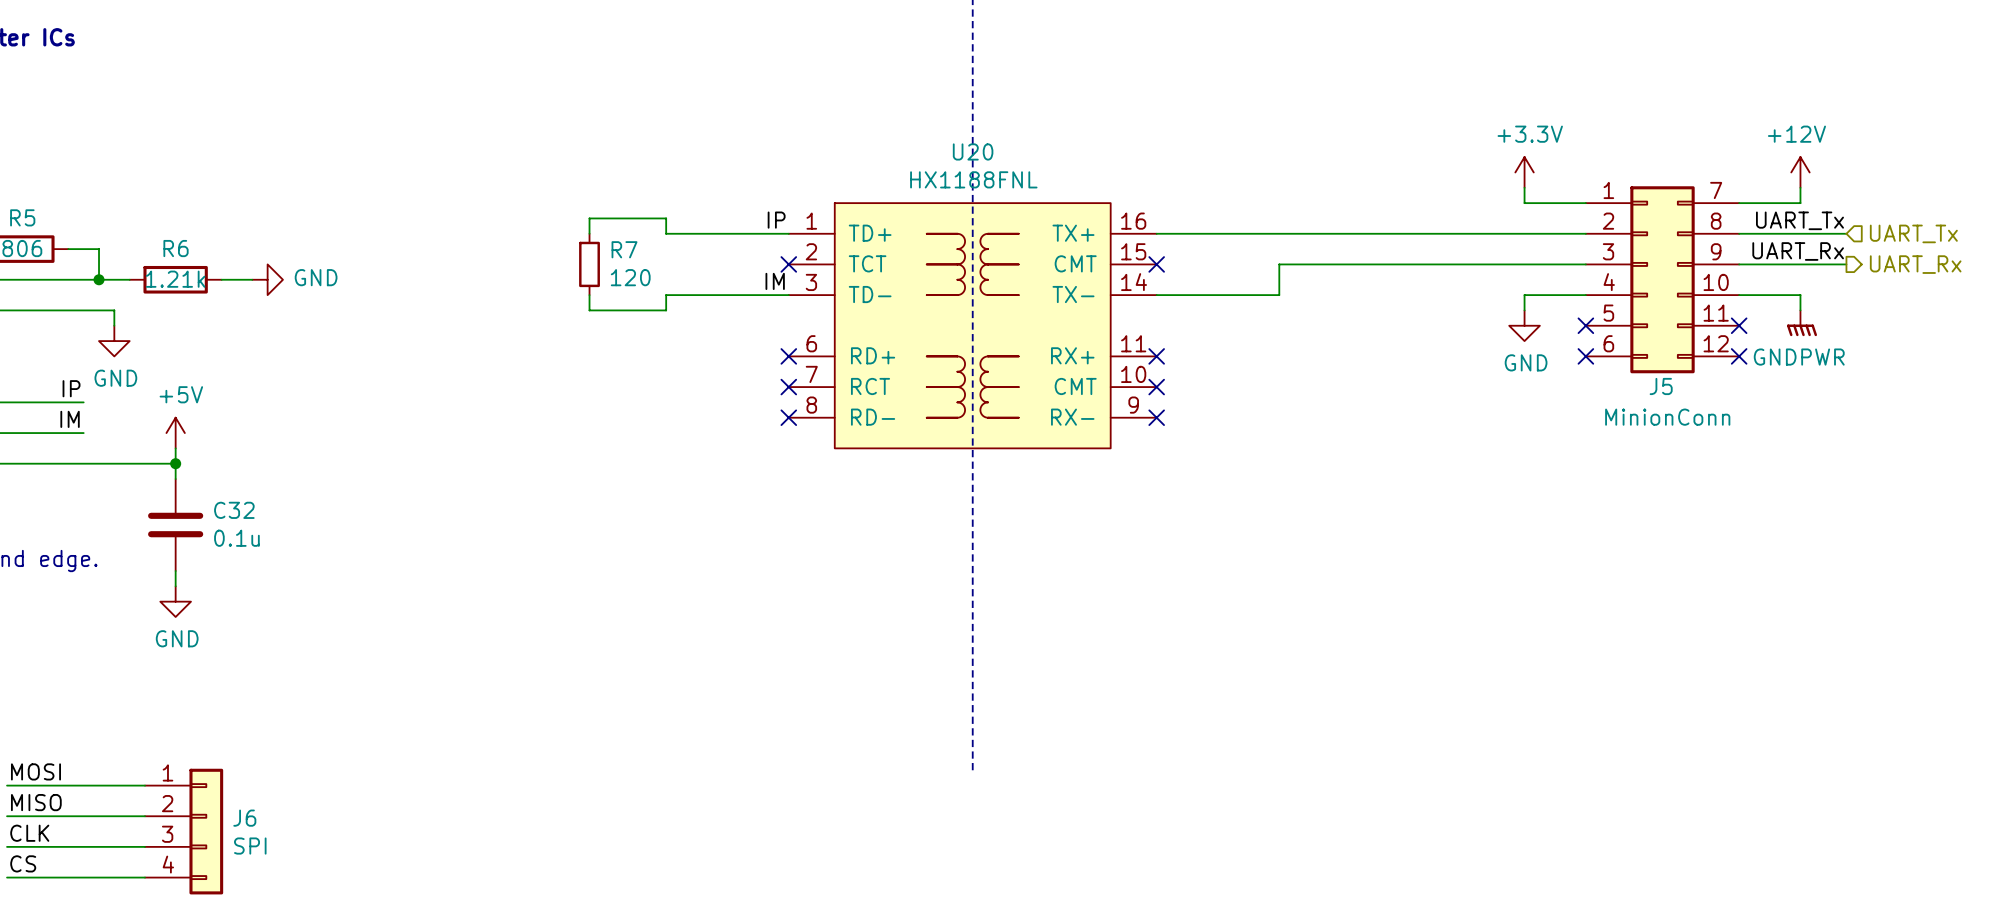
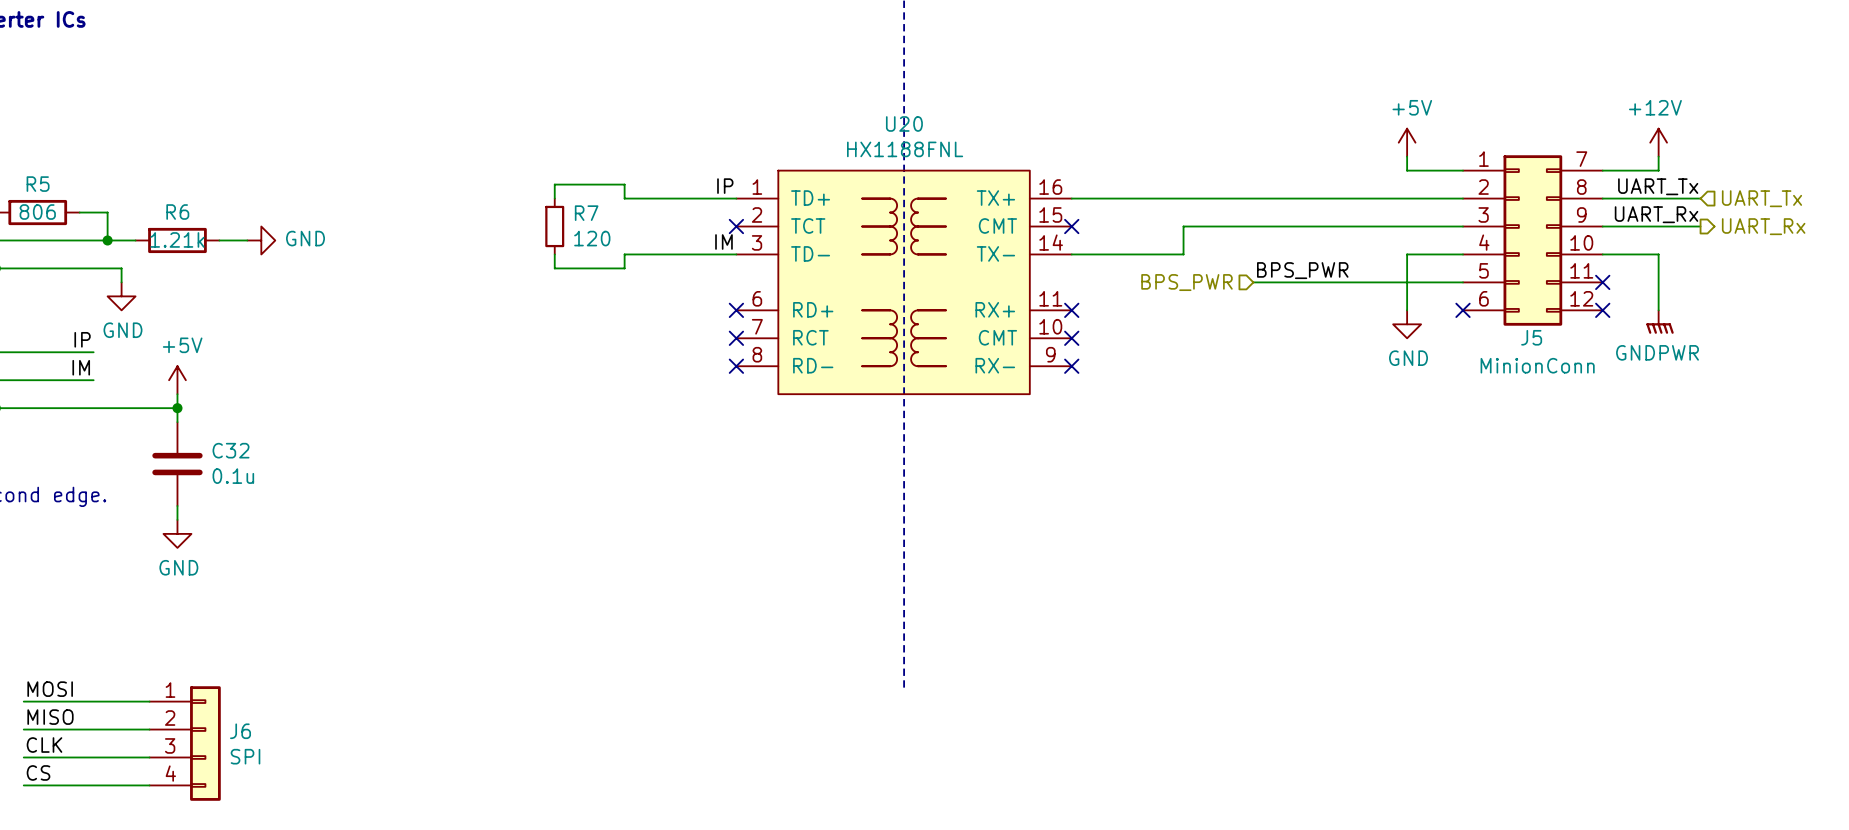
power symbol: +3.3V (1524, 172) -> +5V (1407, 142)
wire: none -> (1407, 268) (1407, 310)
wire: none -> (1658, 268) (1658, 310)
label: none -> BPS_PWR (1302, 270)
power symbol position: GNDPWR (1801, 323) -> GNDPWR (1660, 322)
hierarchical label: none -> BPS_PWR (1186, 282)
wire: none -> (1253, 282) (1463, 282)
power symbol position: GND (1524, 325) -> GND (1407, 324)
no-connect mark: (1585, 325) -> none

